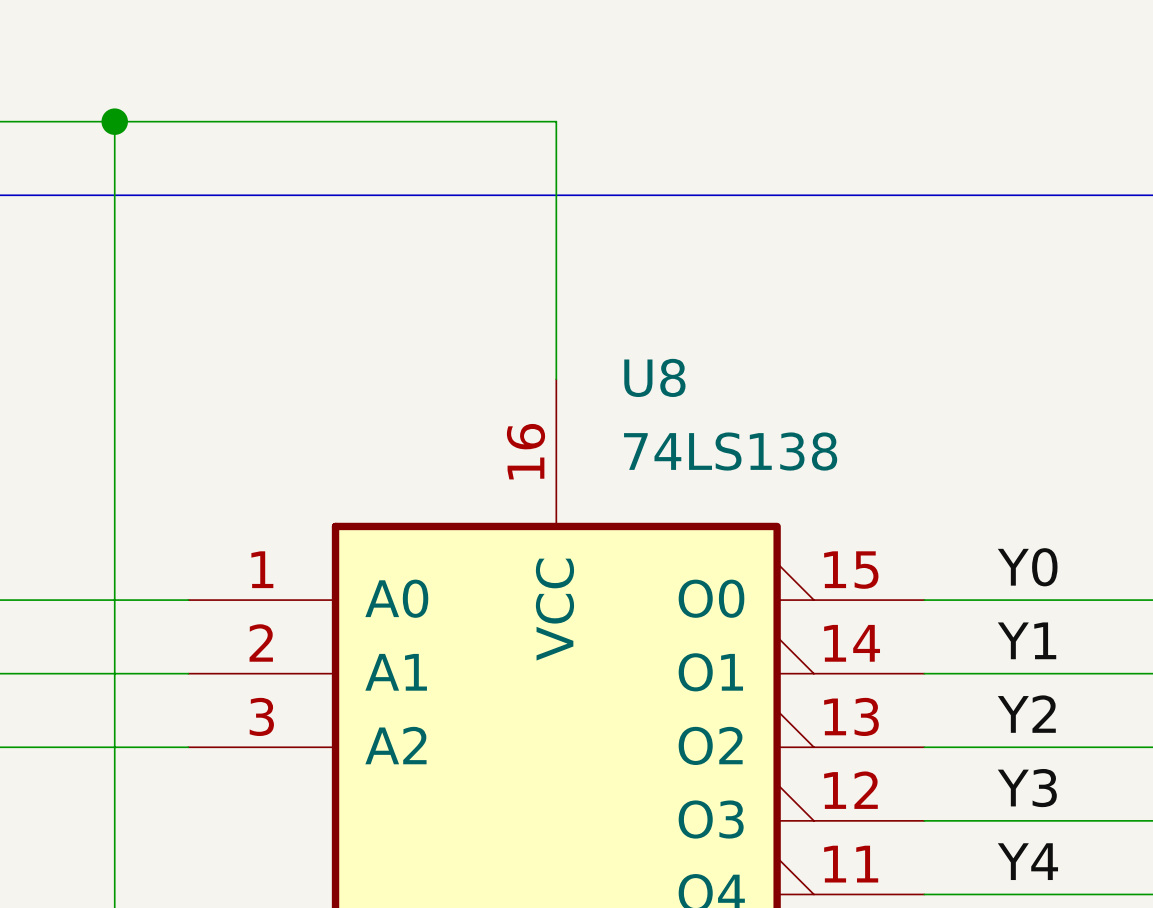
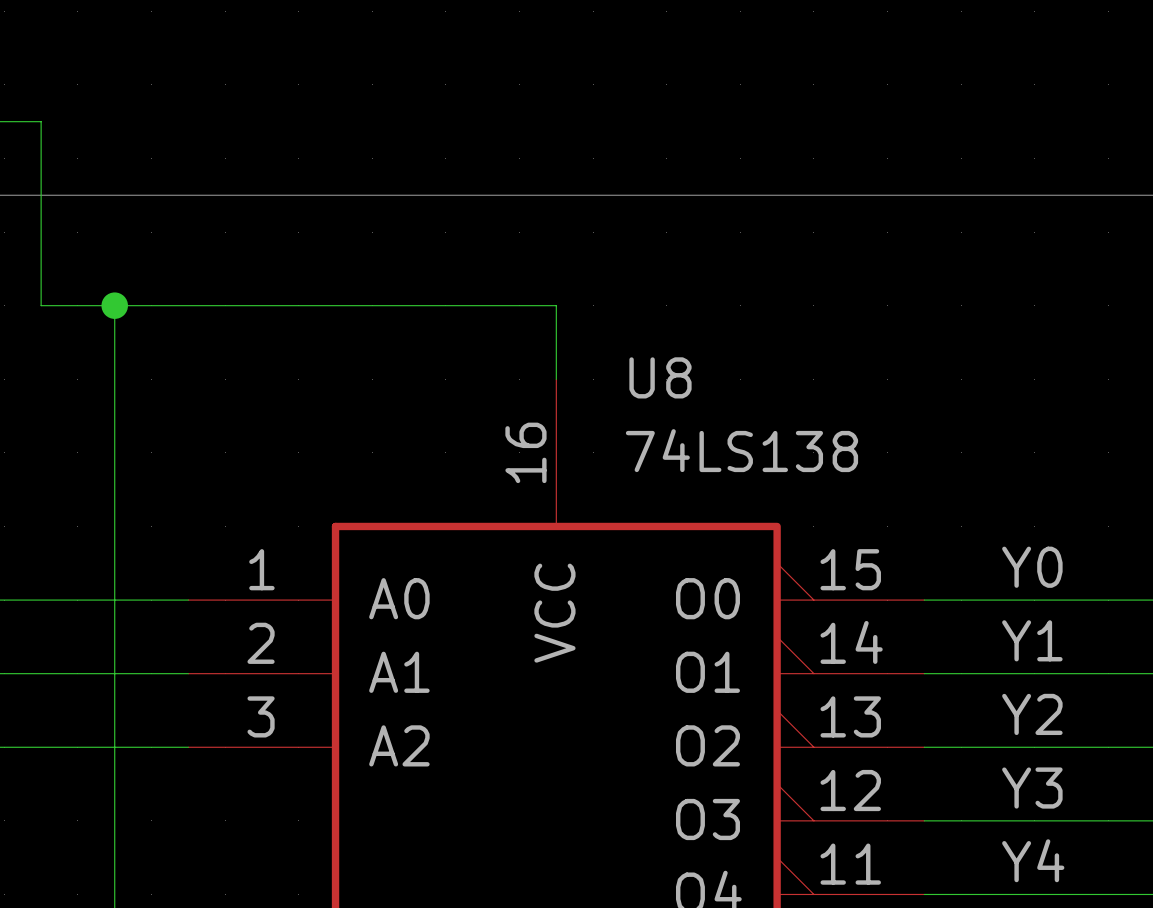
wire: (41, 121) (556, 121) (556, 305) -> (41, 121) (41, 305) (556, 305)
wire: (114, 121) (114, 305) -> none
junction: (114, 121) -> none
junction: none -> (114, 305)

